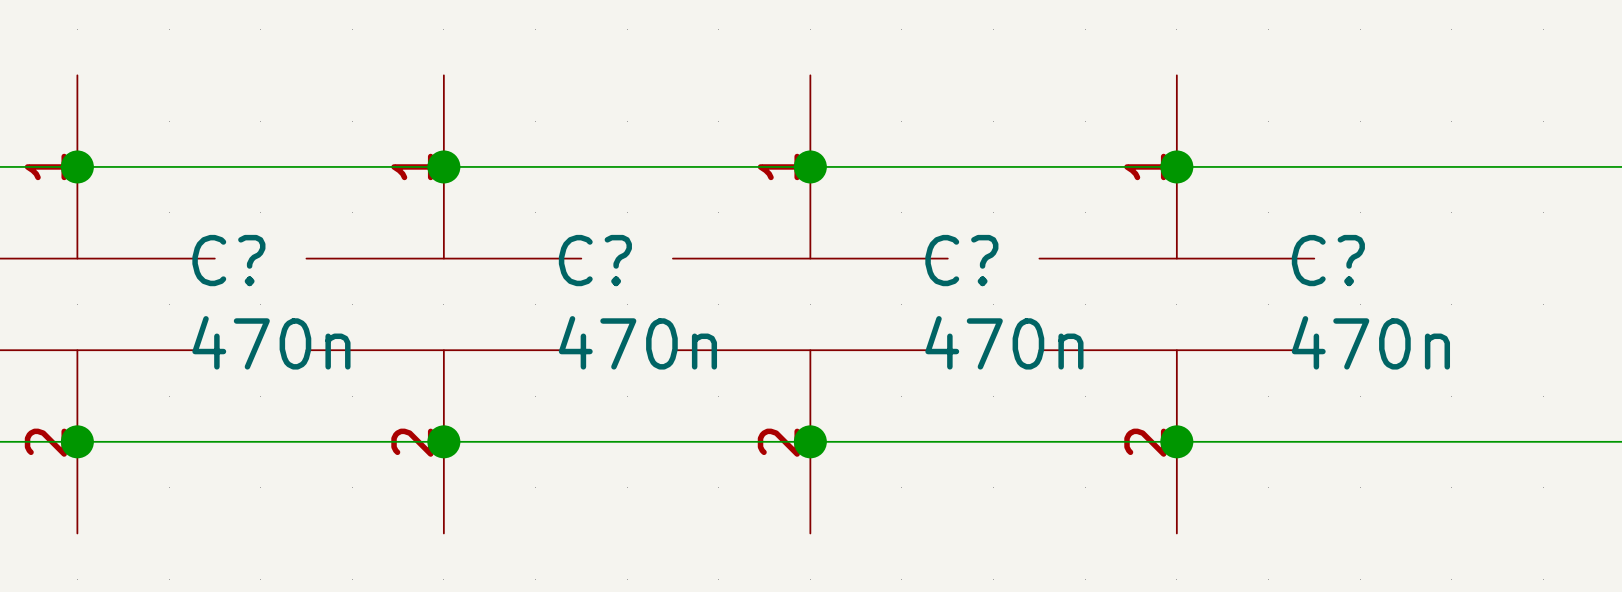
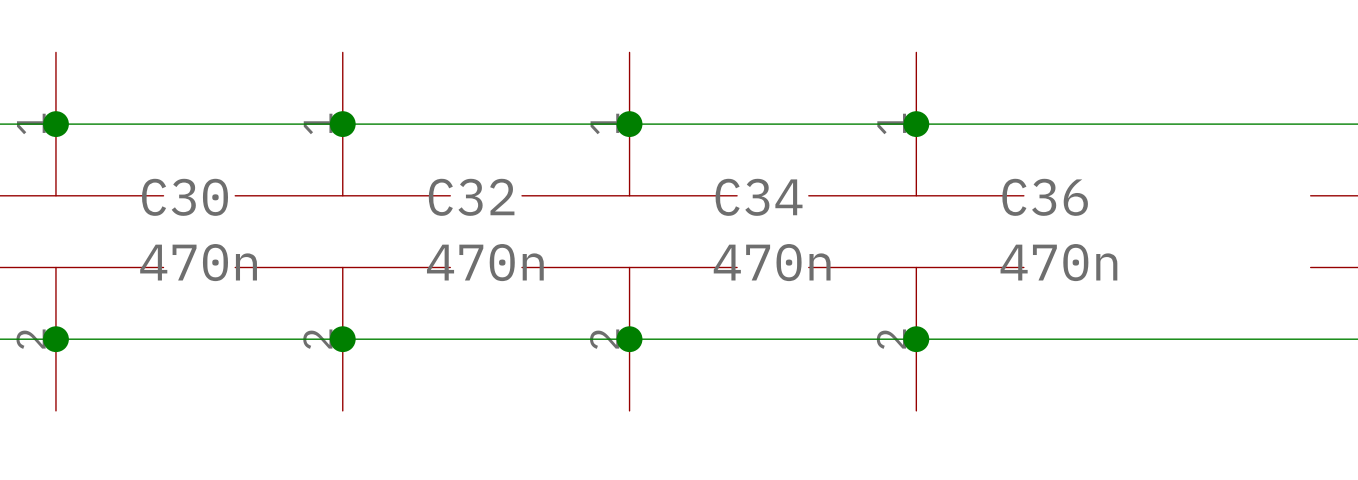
C? name: C? (228, 260) -> C30 (185, 197)
C? name: C? (595, 260) -> C32 (471, 197)
C? name: C? (961, 260) -> C34 (759, 197)
C? name: C? (1328, 260) -> C36 (1045, 197)

